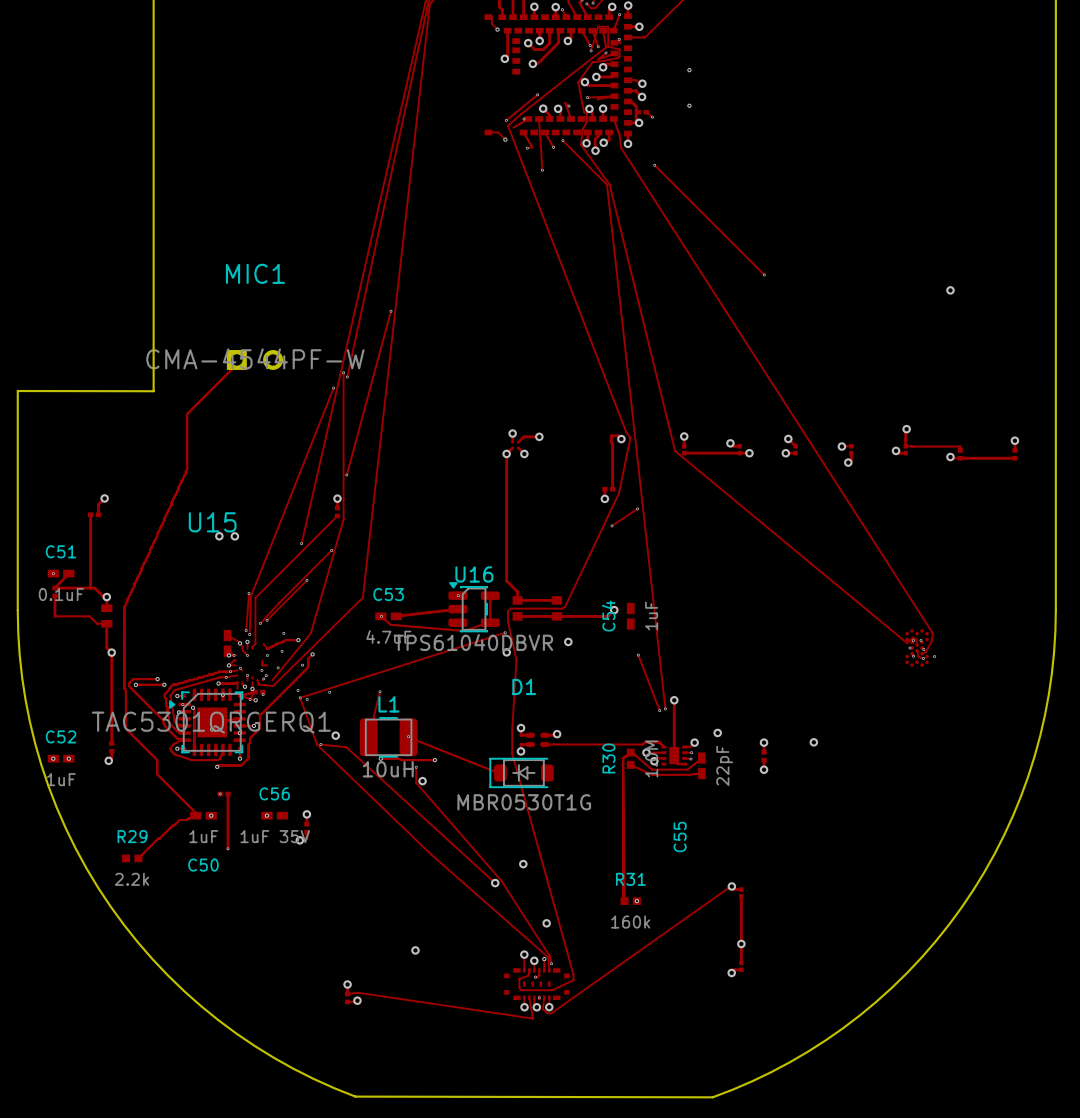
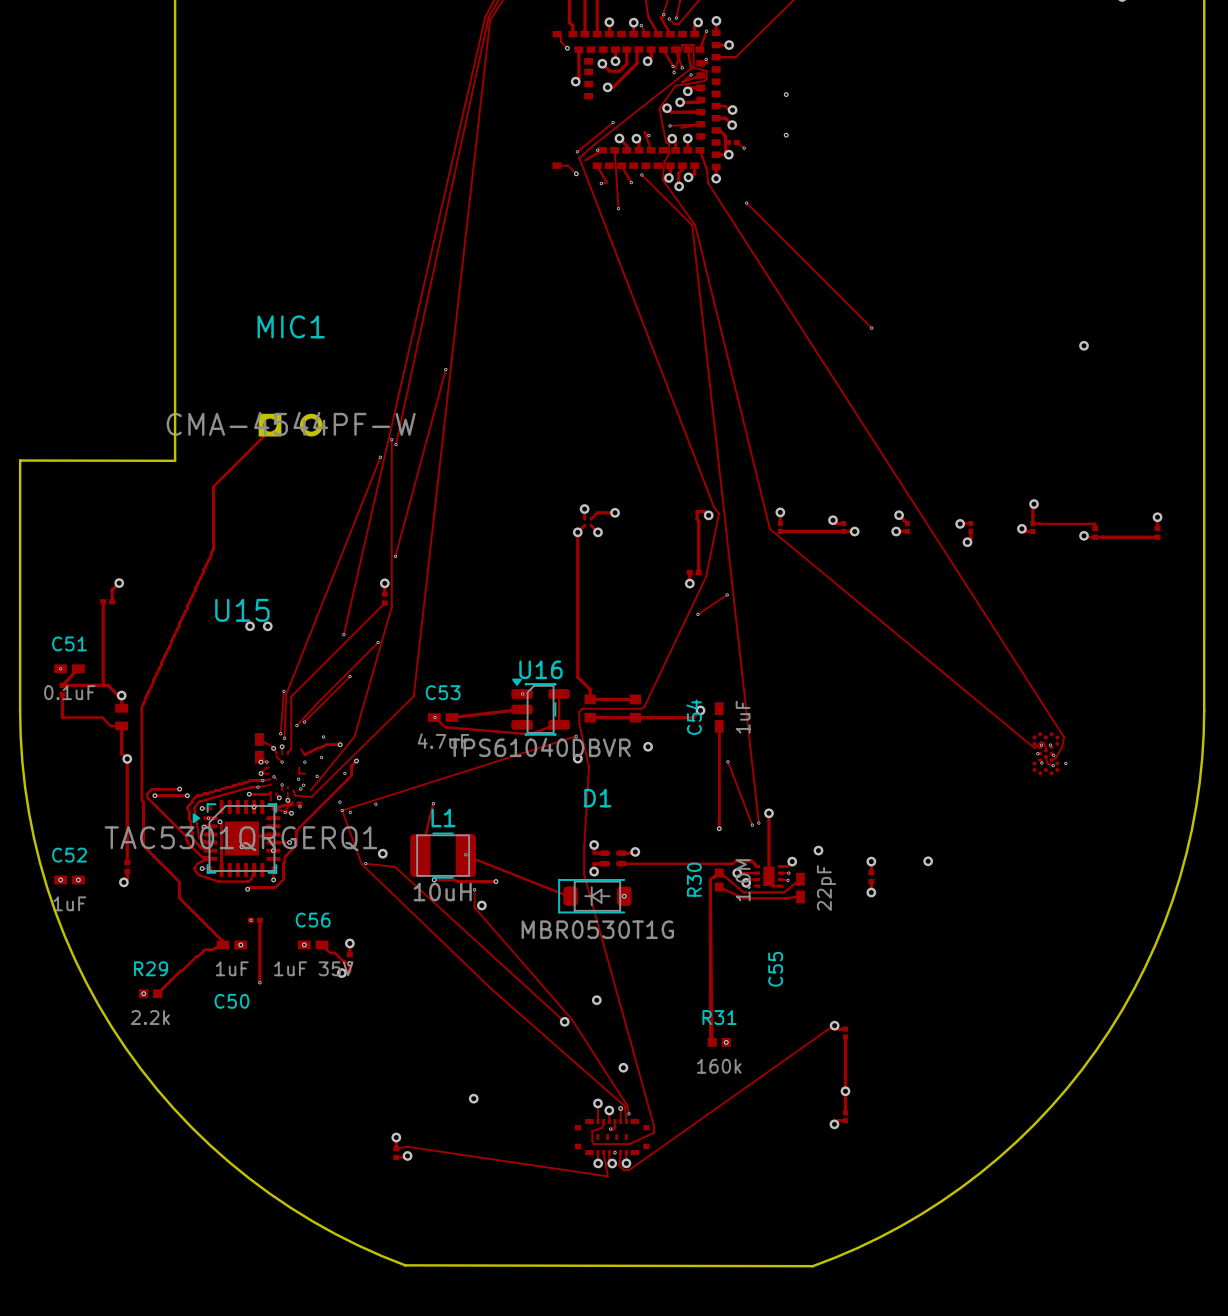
track: none -> (719, 726) (719, 828)
via: none -> (719, 828)
via: none -> (624, 896)
track: none -> (322, 944) (330, 953) (335, 953) (343, 961) (349, 963)
via: none -> (349, 963)
via: none -> (143, 993)

